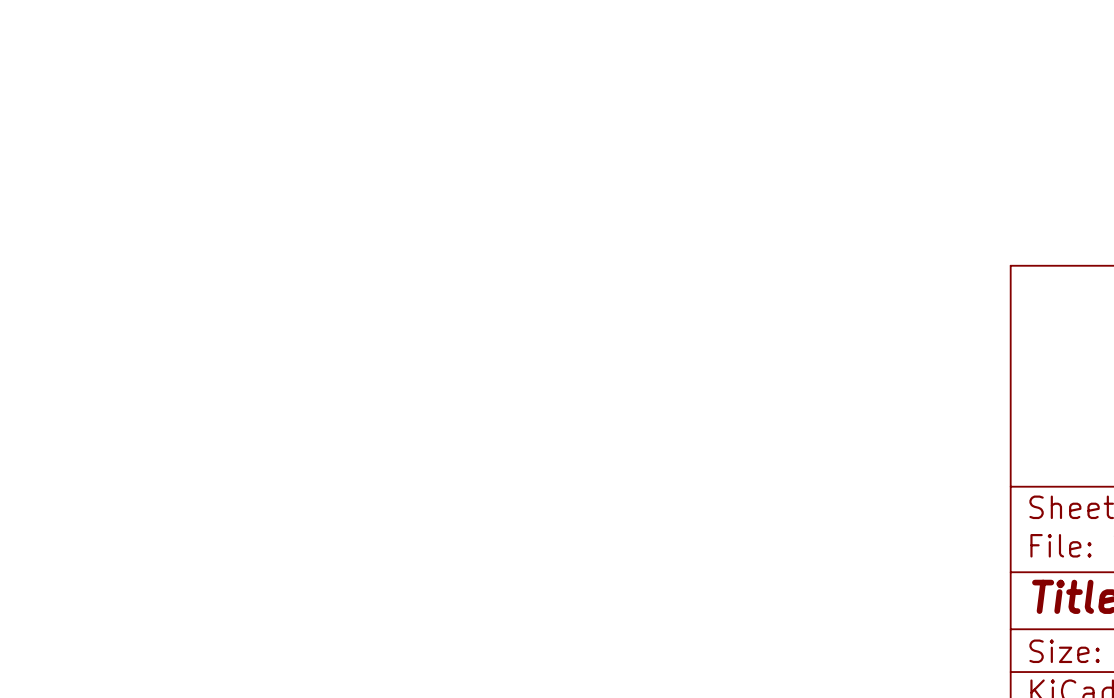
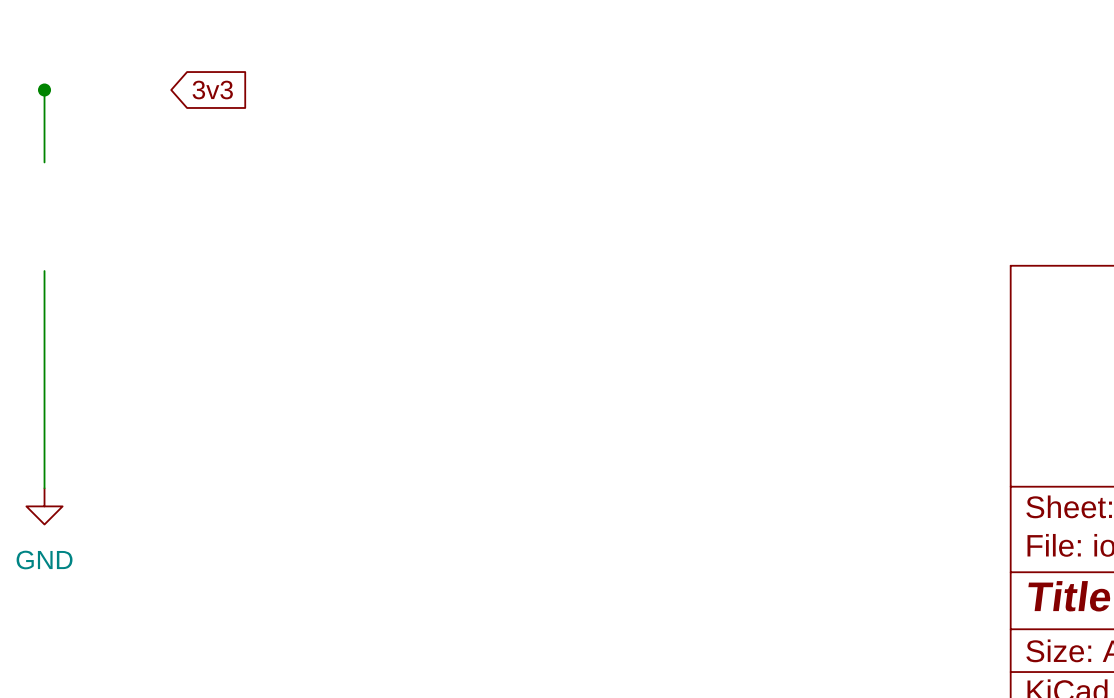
wire: none -> (44, 90) (44, 162)
junction: none -> (44, 90)
global label: none -> 3v3 (212, 90)
wire: none -> (44, 271) (44, 488)
power symbol: none -> GND (44, 506)

